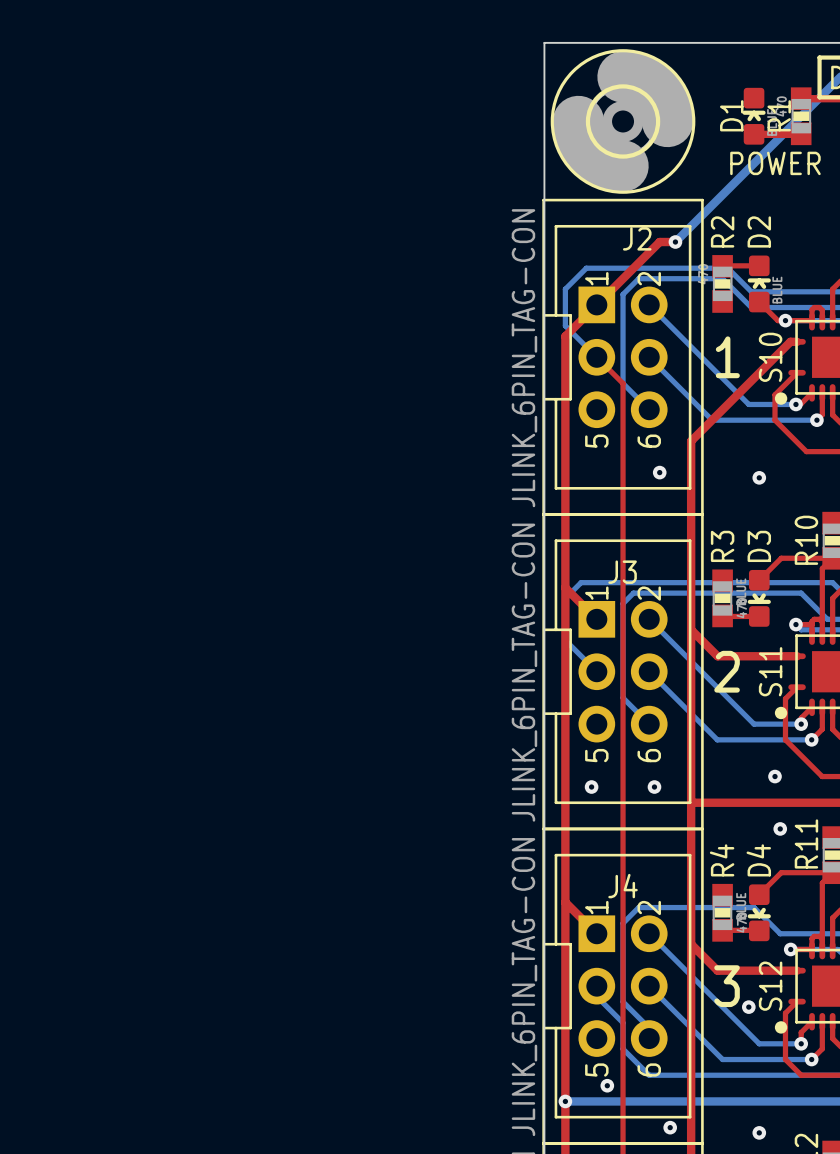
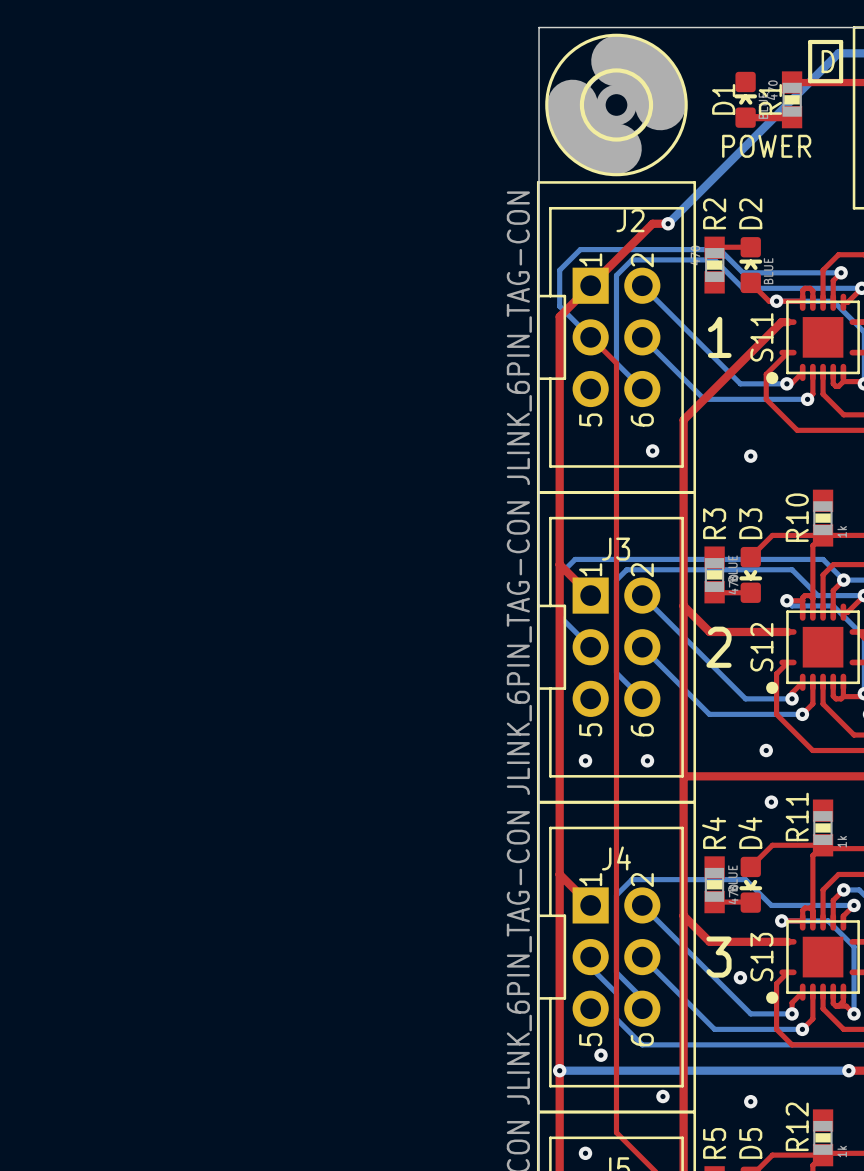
S10 name: S10 (770, 357) -> S11 (761, 337)
S11 name: S11 (770, 671) -> S12 (761, 647)
S12 name: S12 (770, 986) -> S13 (761, 957)

